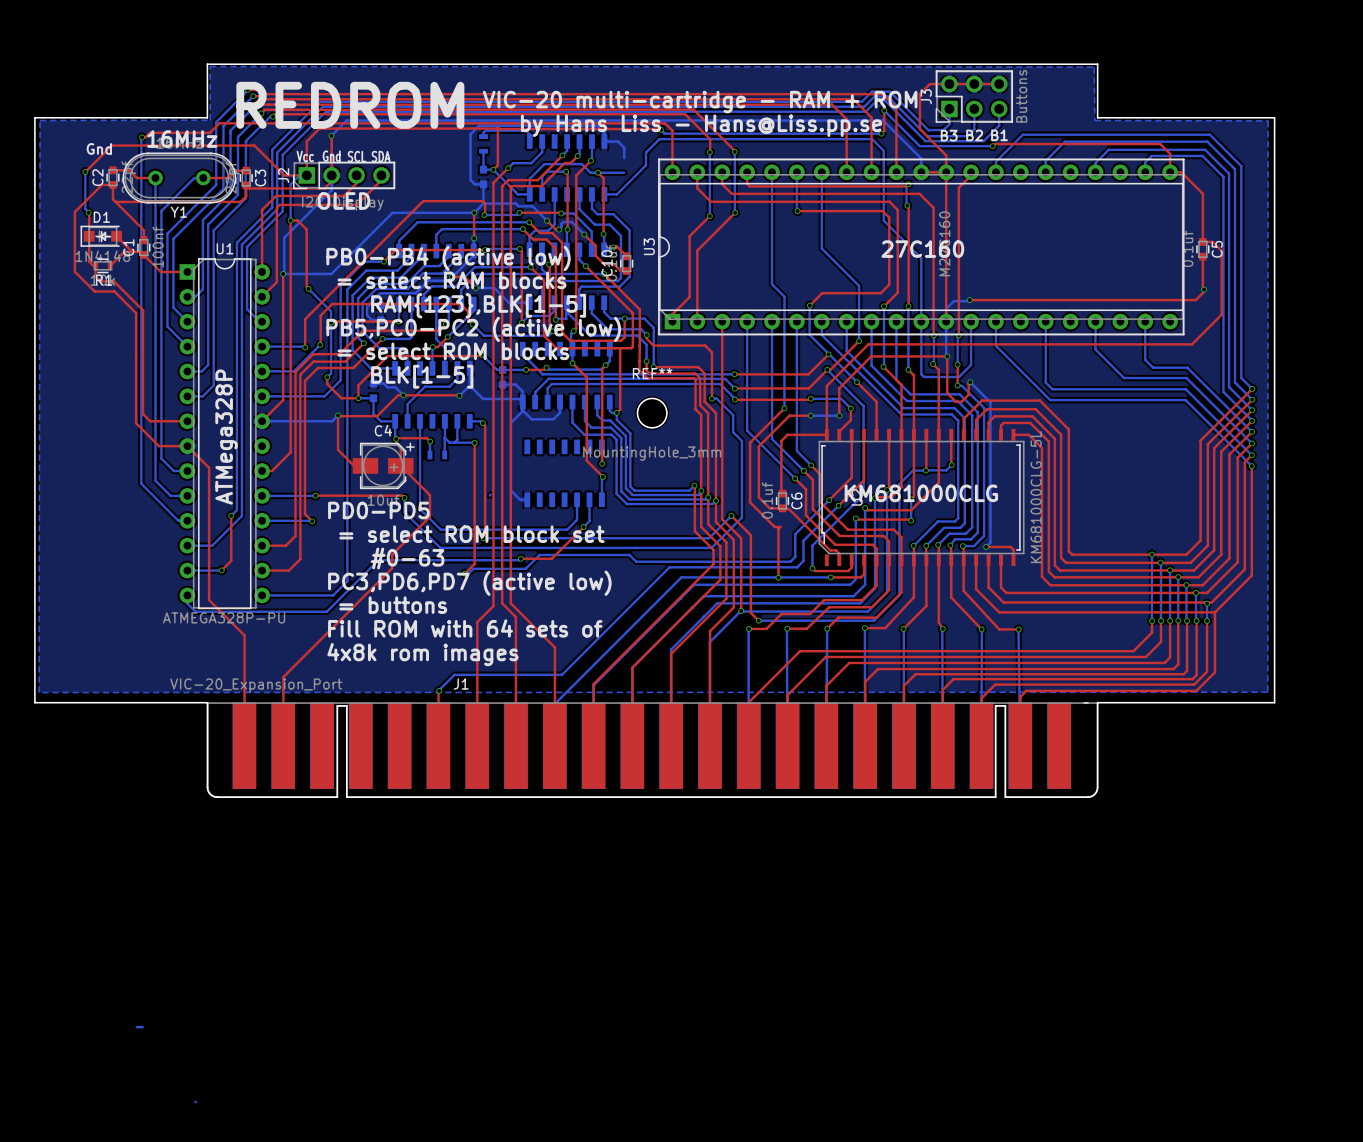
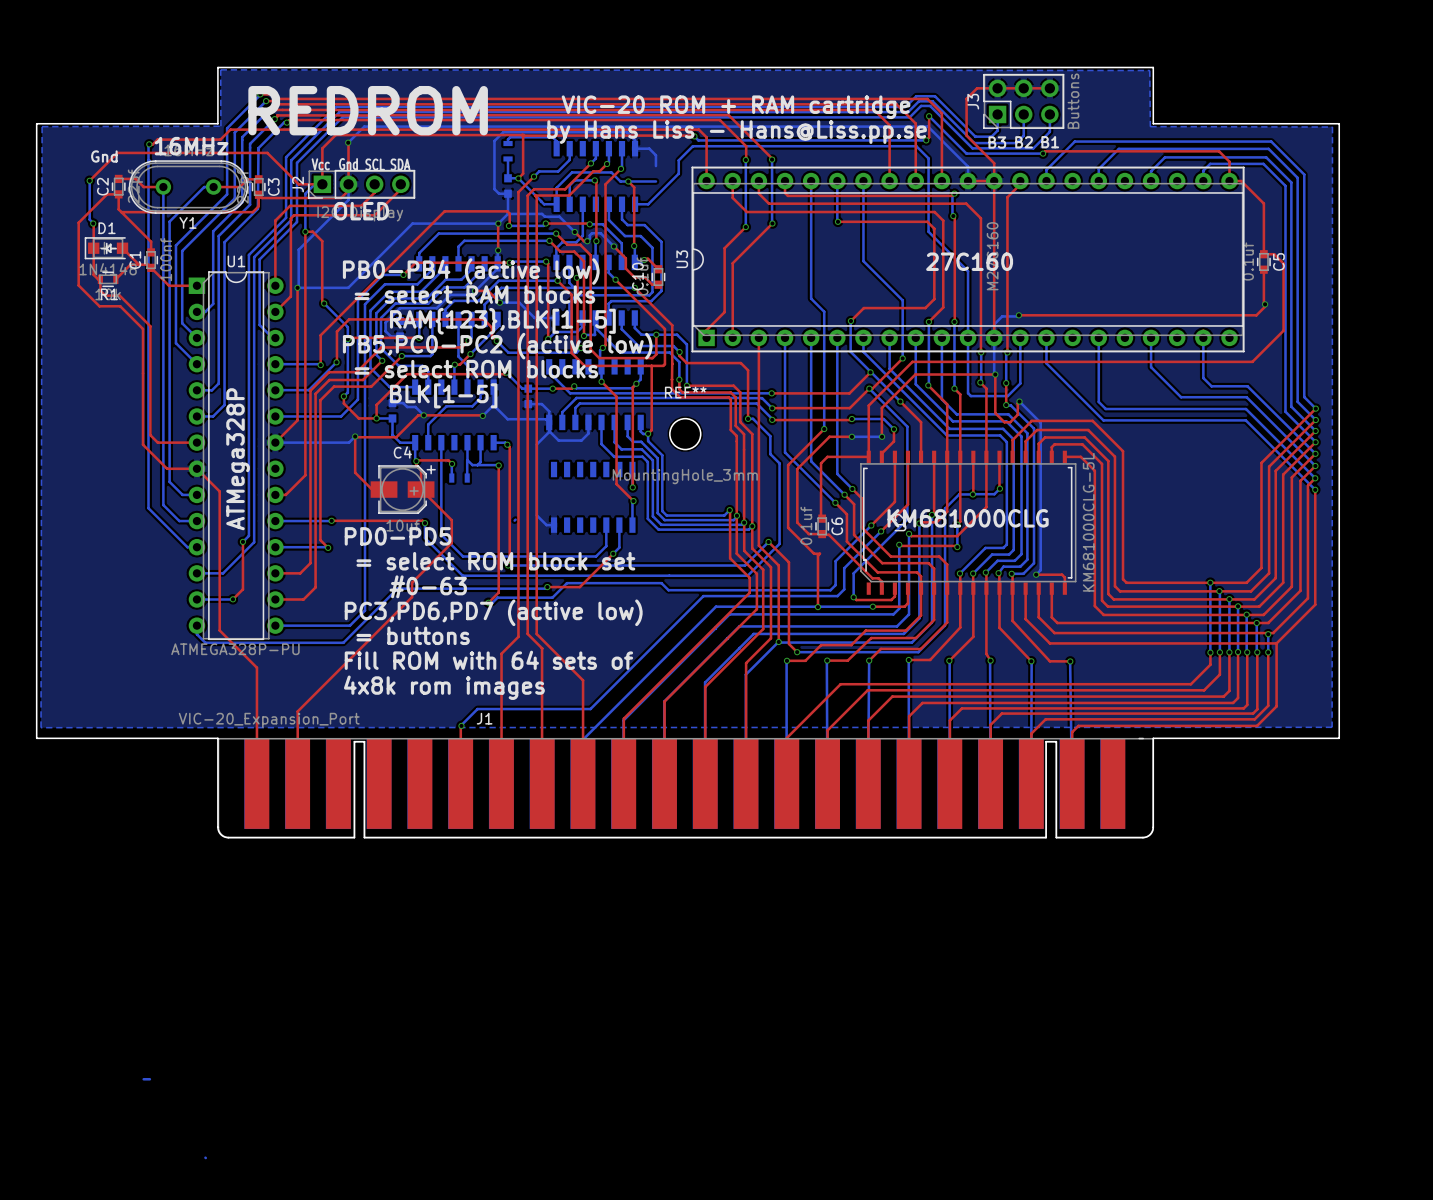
text: VIC-20 multi-cartridge - RAM + ROM (700, 102) -> VIC-20 ROM + RAM cartridge (736, 107)

